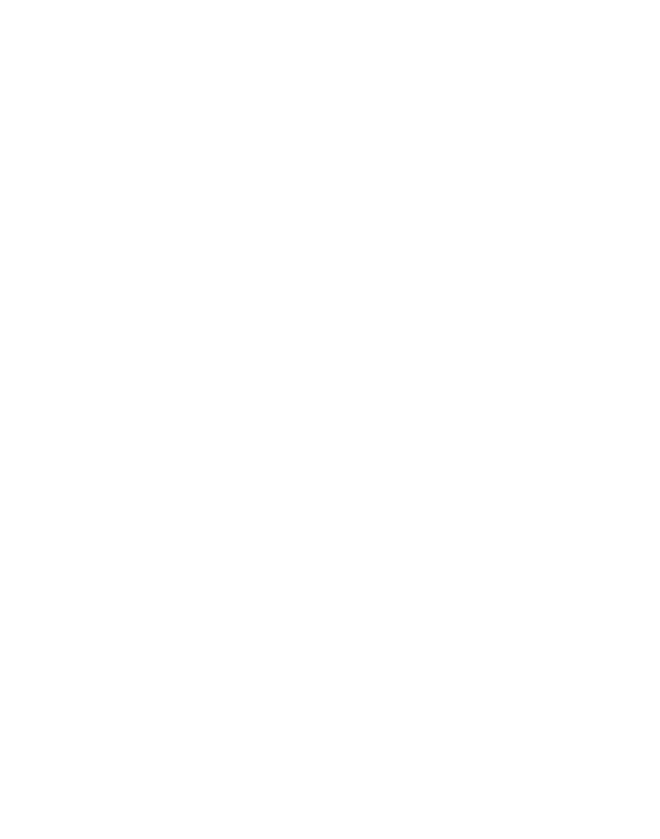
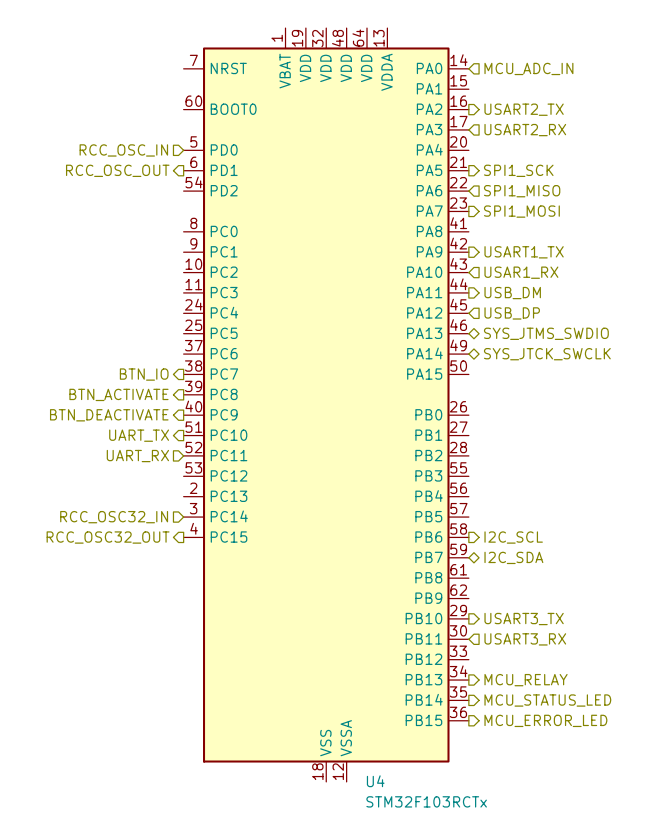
hierarchical label: none -> MCU_ADC_IN (528, 68)
hierarchical label: none -> USART2_TX (524, 109)
hierarchical label: none -> USART2_RX (525, 130)
hierarchical label: none -> RCC_OSC_IN (123, 150)
hierarchical label: none -> RCC_OSC_OUT (117, 170)
hierarchical label: none -> SPI1_SCK (518, 170)
hierarchical label: none -> SPI1_MISO (522, 191)
hierarchical label: none -> SPI1_MOSI (521, 211)
hierarchical label: none -> USART1_TX (524, 252)
hierarchical label: none -> USAR1_RX (521, 272)
hierarchical label: none -> USB_DM (512, 293)
hierarchical label: none -> USB_DP (512, 313)
hierarchical label: none -> SYS_JTMS_SWDIO (546, 333)
hierarchical label: none -> SYS_JTCK_SWCLK (547, 354)
hierarchical label: none -> BTN_IO (144, 374)
hierarchical label: none -> BTN_ACTIVATE (118, 394)
U4: none -> STM32F103RCTx (326, 404)
hierarchical label: none -> BTN_DEACTIVATE (109, 415)
hierarchical label: none -> UART_TX (139, 435)
hierarchical label: none -> UART_RX (137, 456)
hierarchical label: none -> RCC_OSC32_IN (114, 517)
hierarchical label: none -> RCC_OSC32_OUT (108, 537)
hierarchical label: none -> I2C_SCL (513, 537)
hierarchical label: none -> I2C_SDA (513, 557)
hierarchical label: none -> USART3_TX (524, 619)
hierarchical label: none -> USART3_RX (525, 639)
hierarchical label: none -> MCU_RELAY (526, 680)
hierarchical label: none -> MCU_STATUS_LED (547, 700)
hierarchical label: none -> MCU_ERROR_LED (545, 720)

